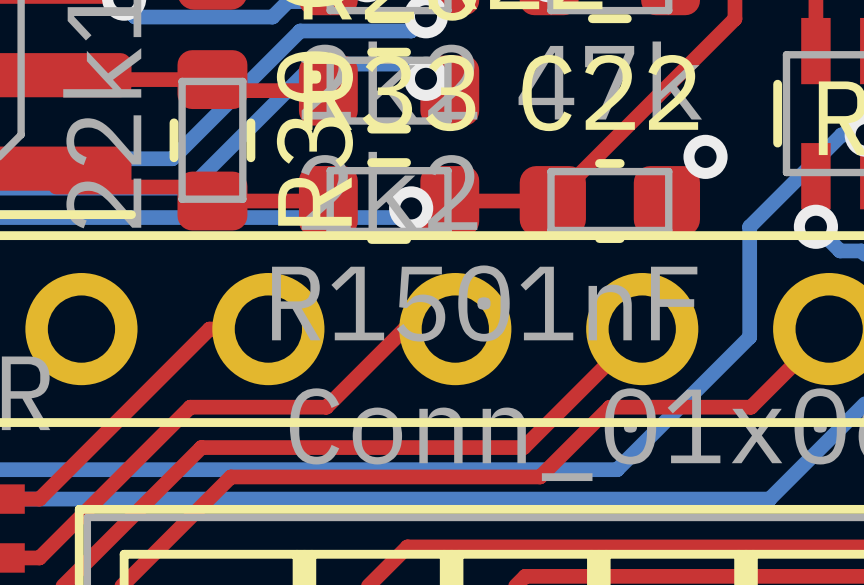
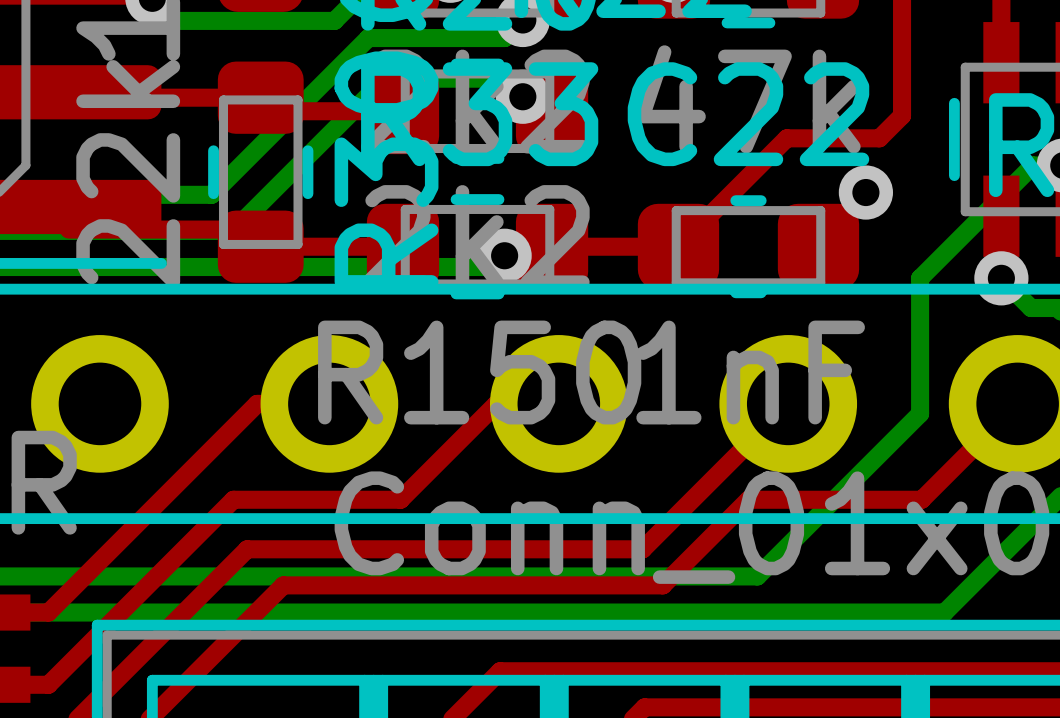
top track: (734, 18) (641, 112) -> (902, 23) (902, 115) (879, 138) (786, 138)

